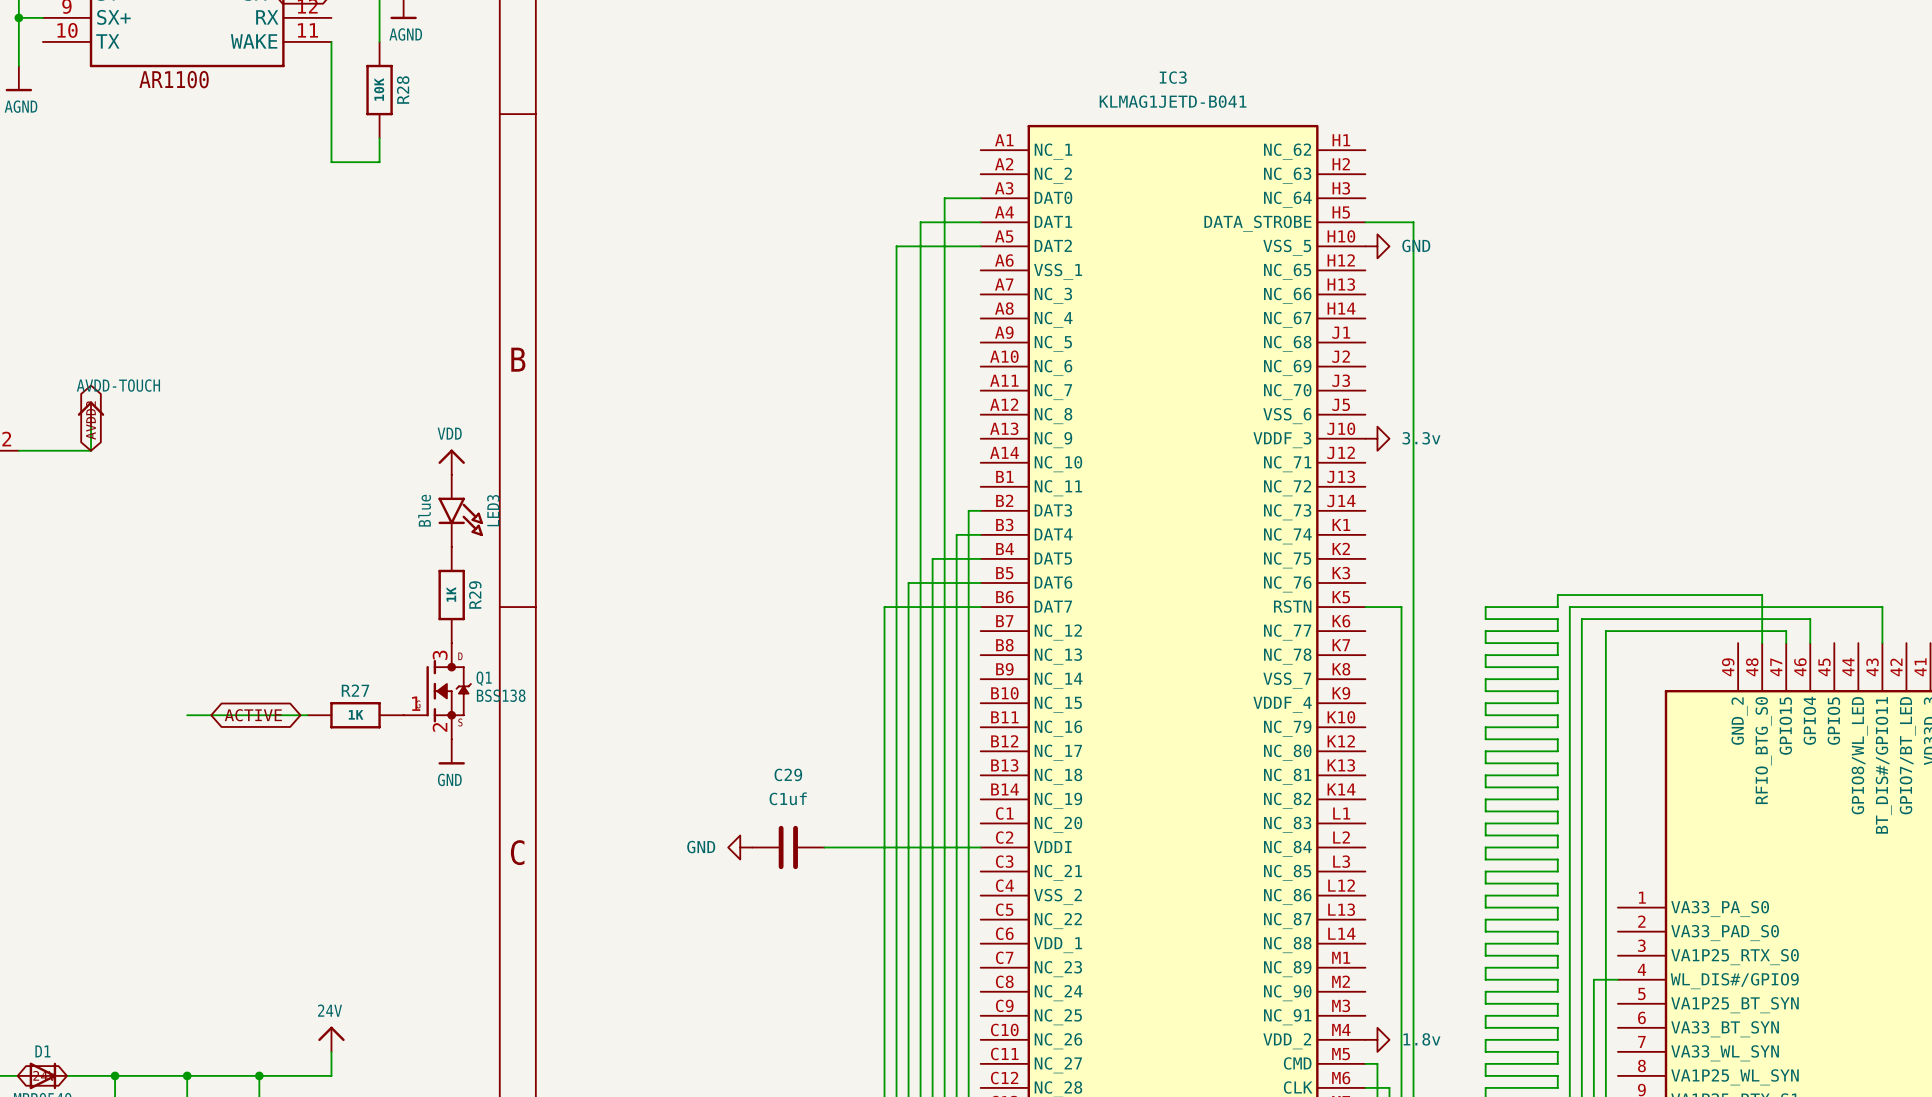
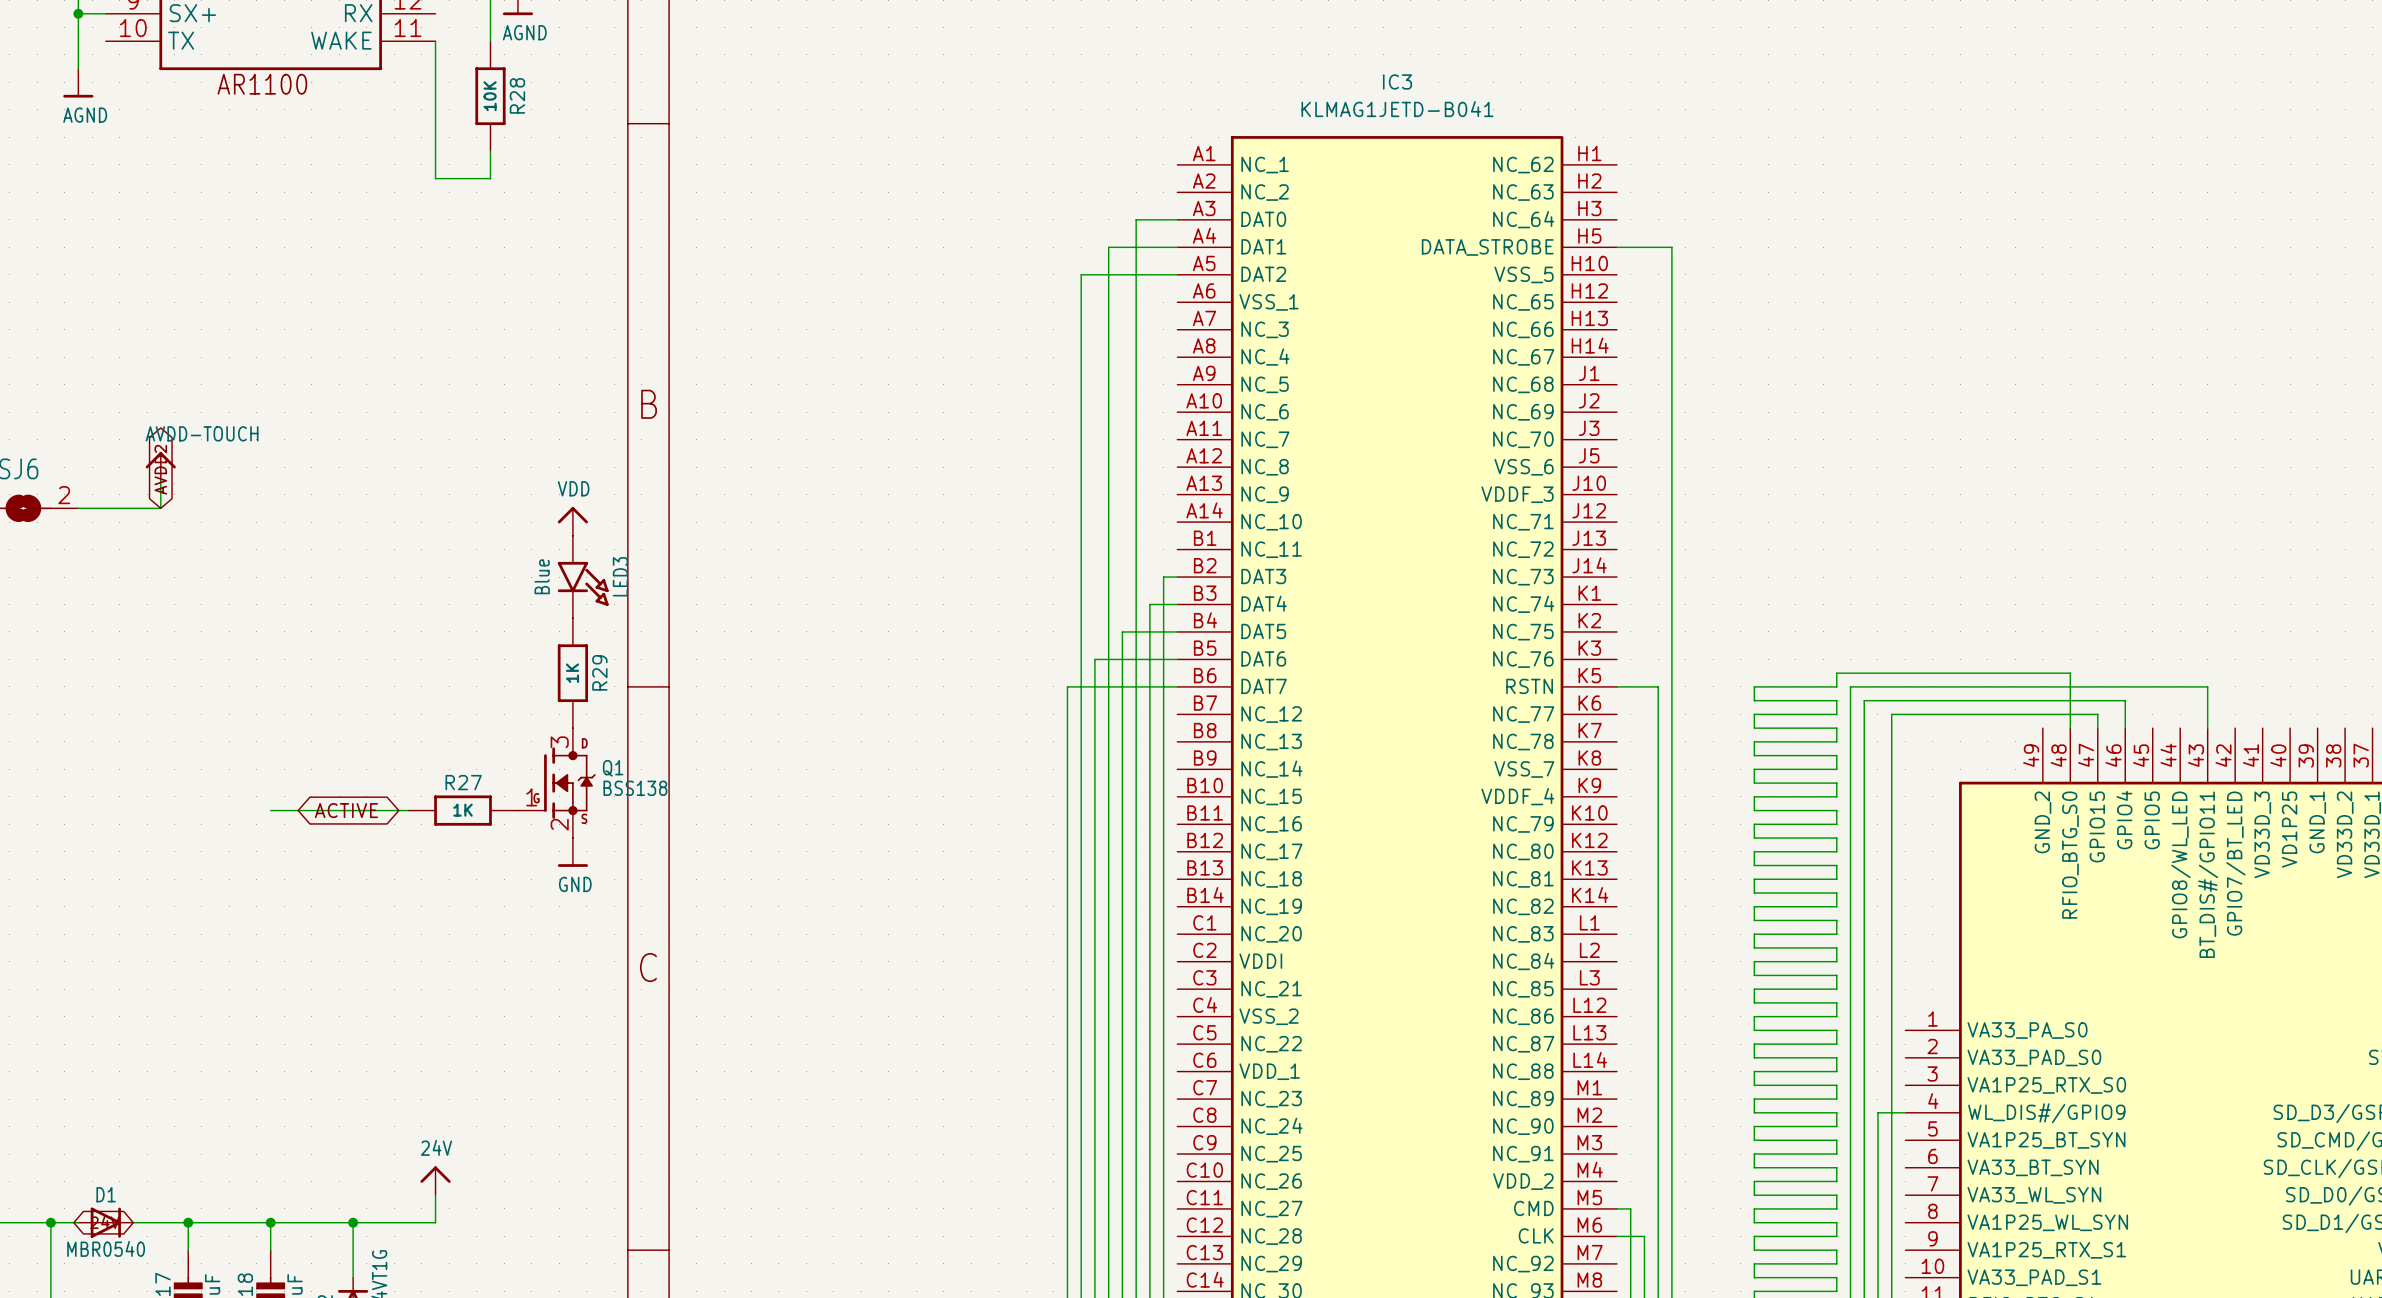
power symbol: GND (1377, 246) -> none
power symbol: 3.3v (1377, 438) -> none
power symbol: GND (740, 847) -> none
C29: C1uf (788, 847) -> none
wire: (824, 847) (980, 847) -> none
power symbol: 1.8v (1377, 1039) -> none

